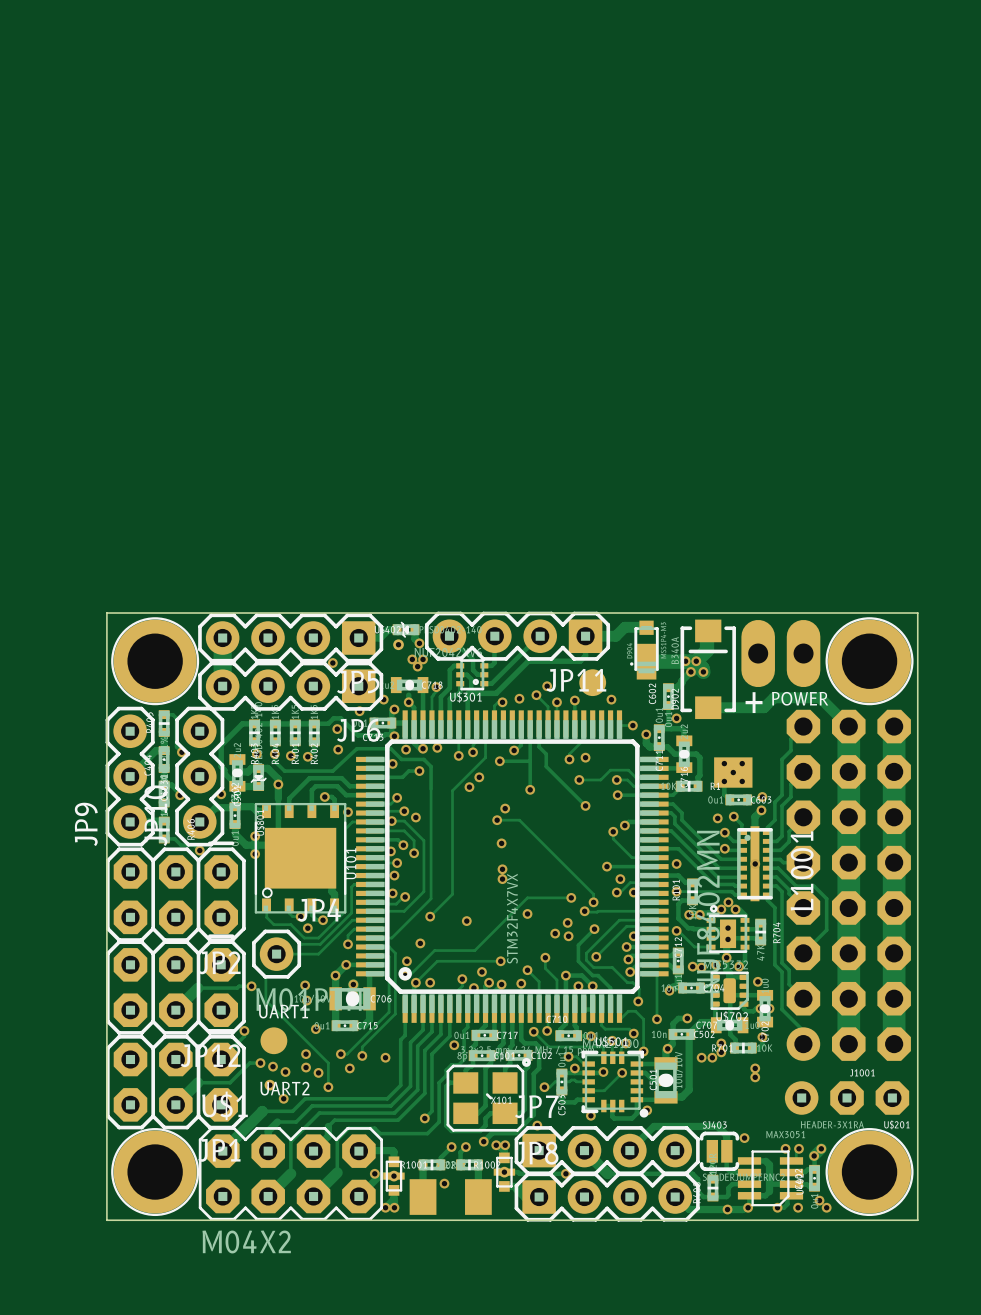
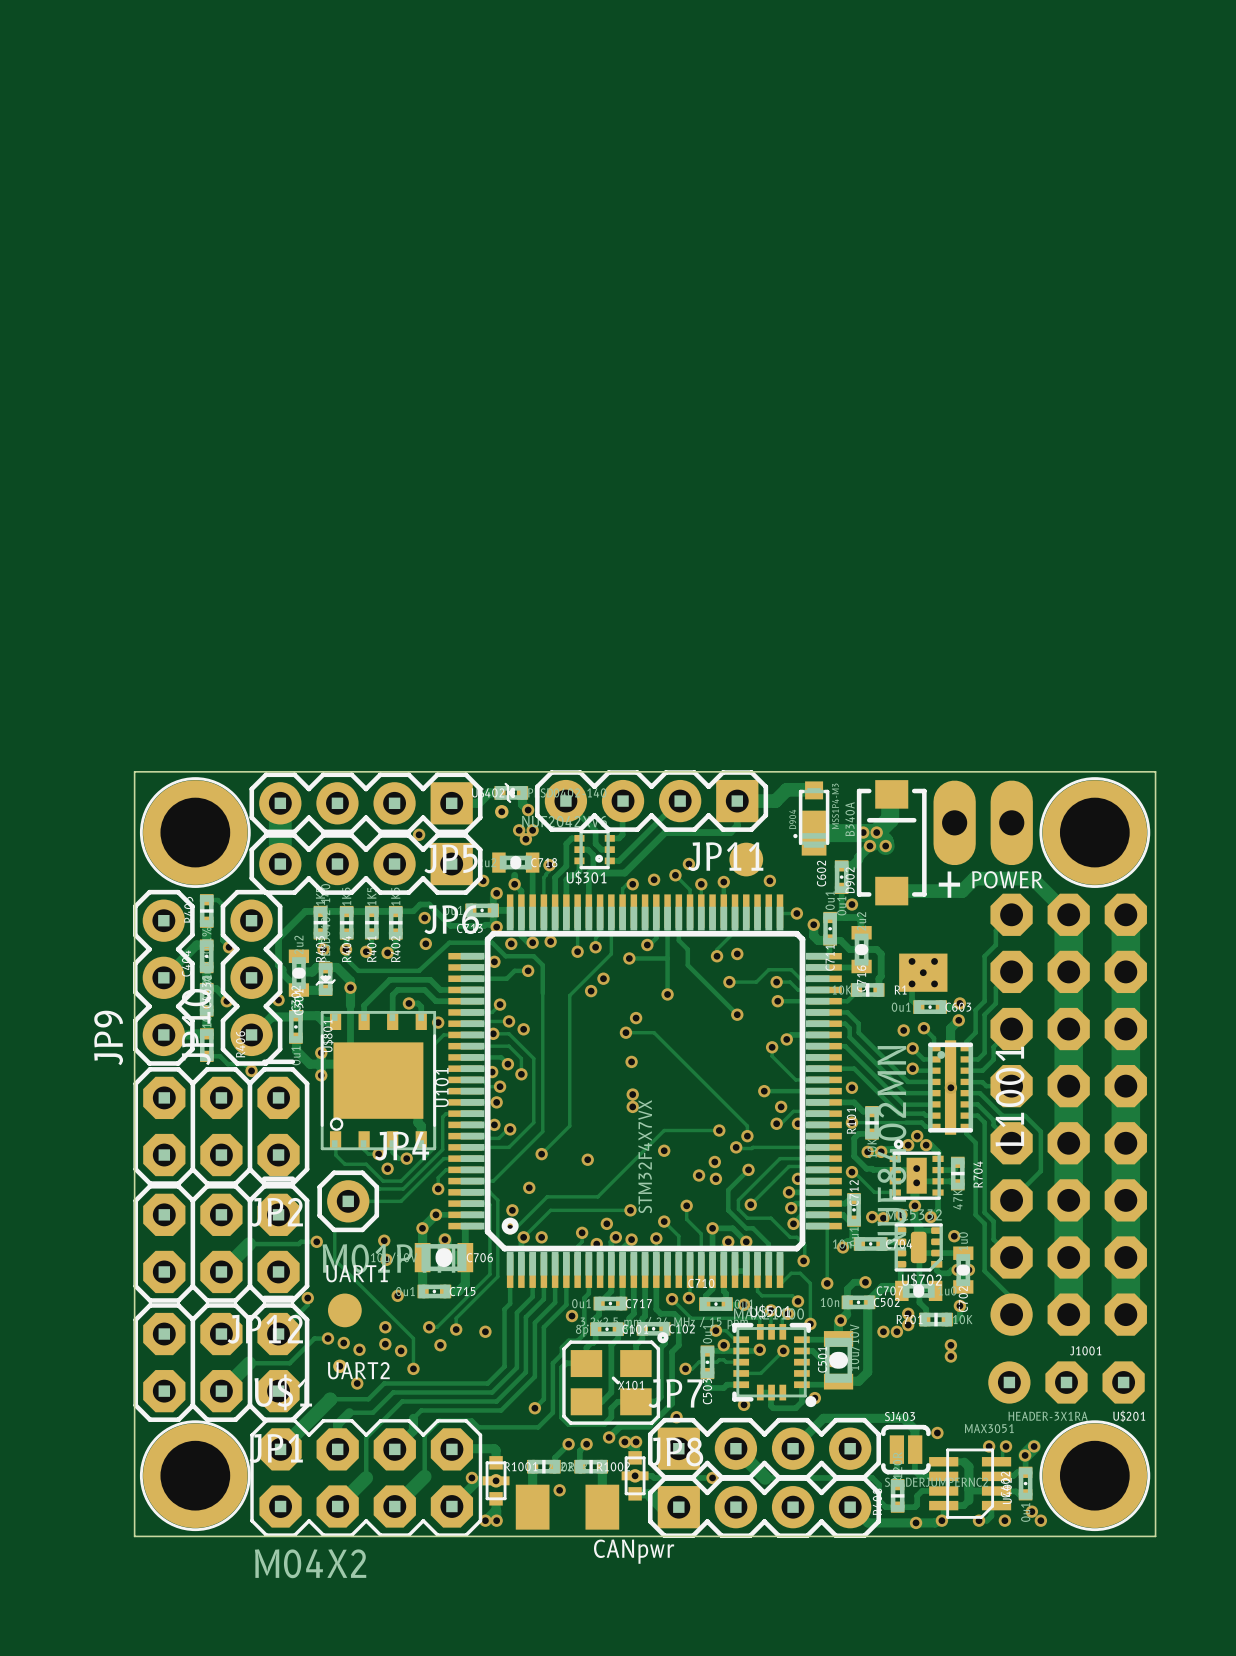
via: (359, 711) -> none
text: none -> CANpwr (634, 1551)

